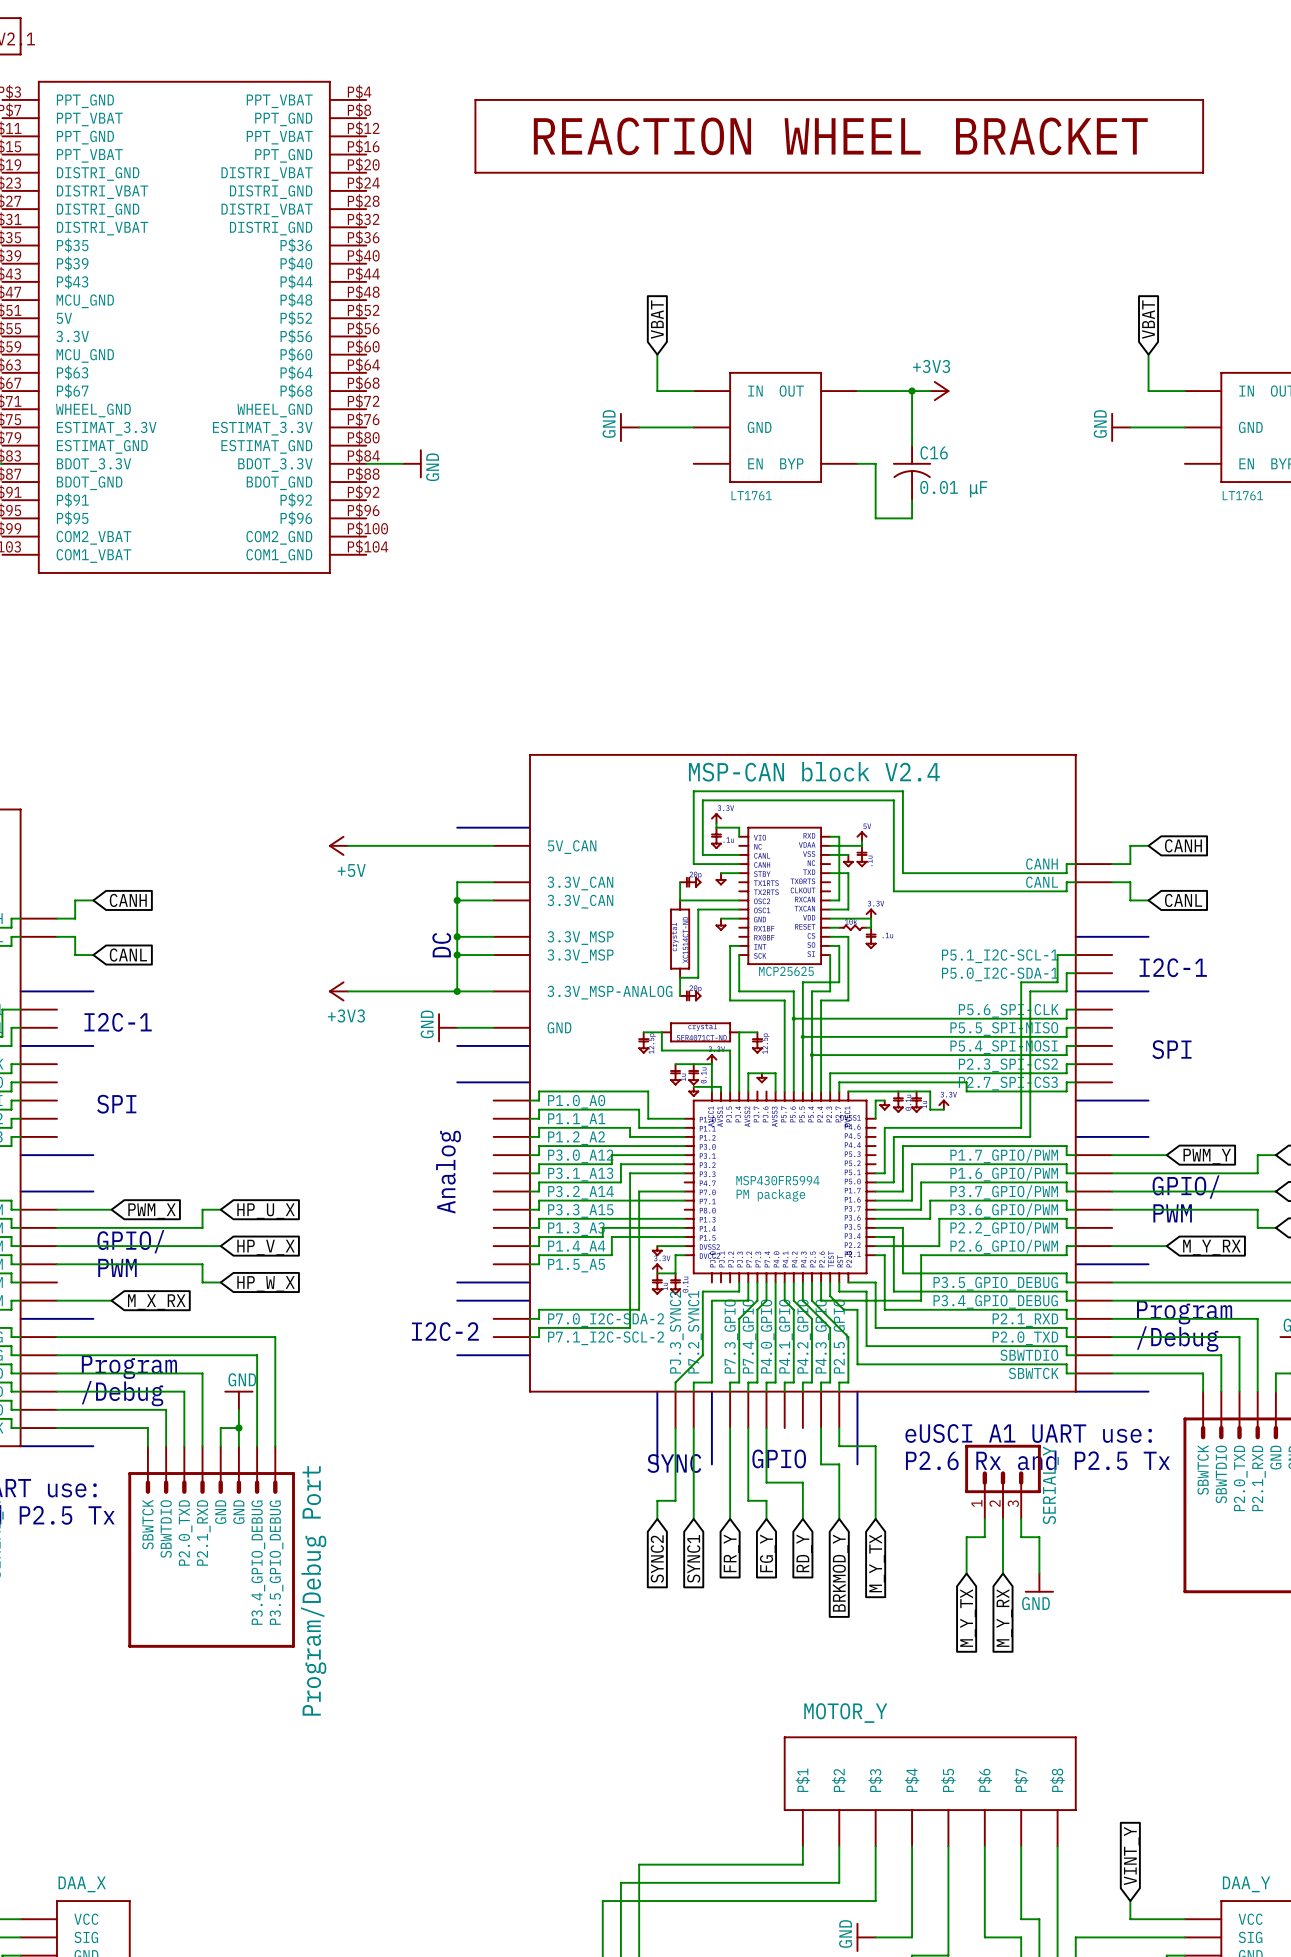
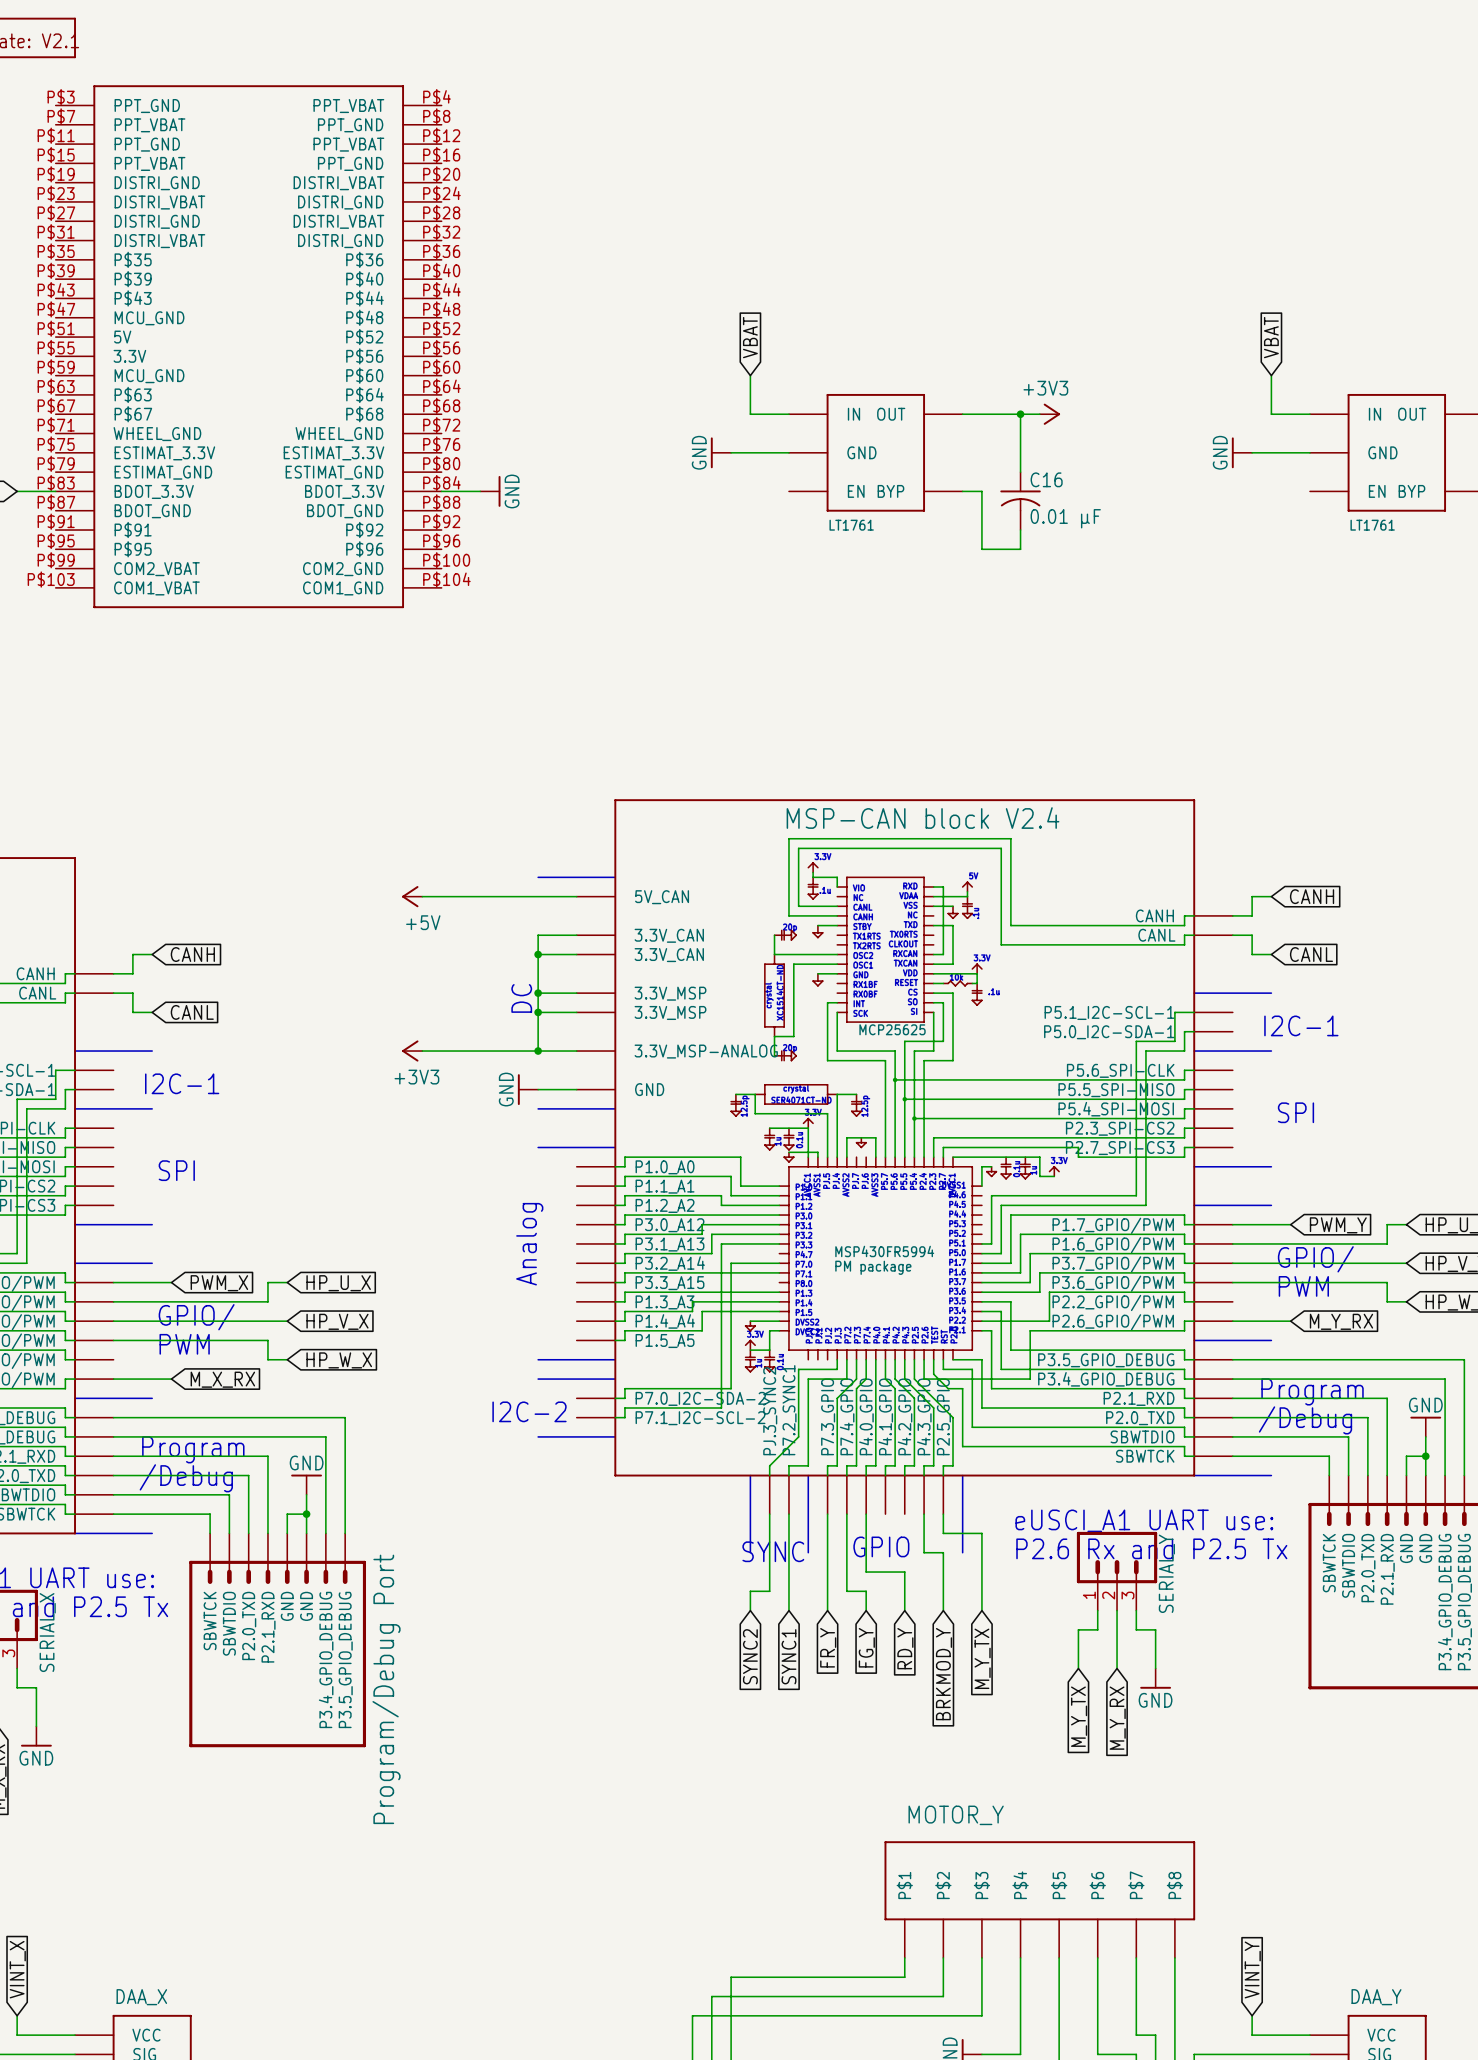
part: (839, 136) -> none

